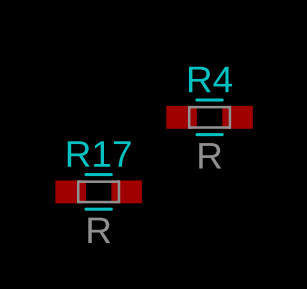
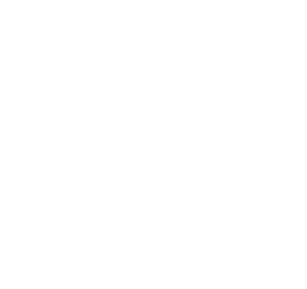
R4: R (209, 117) -> none
R17: R (98, 191) -> none

